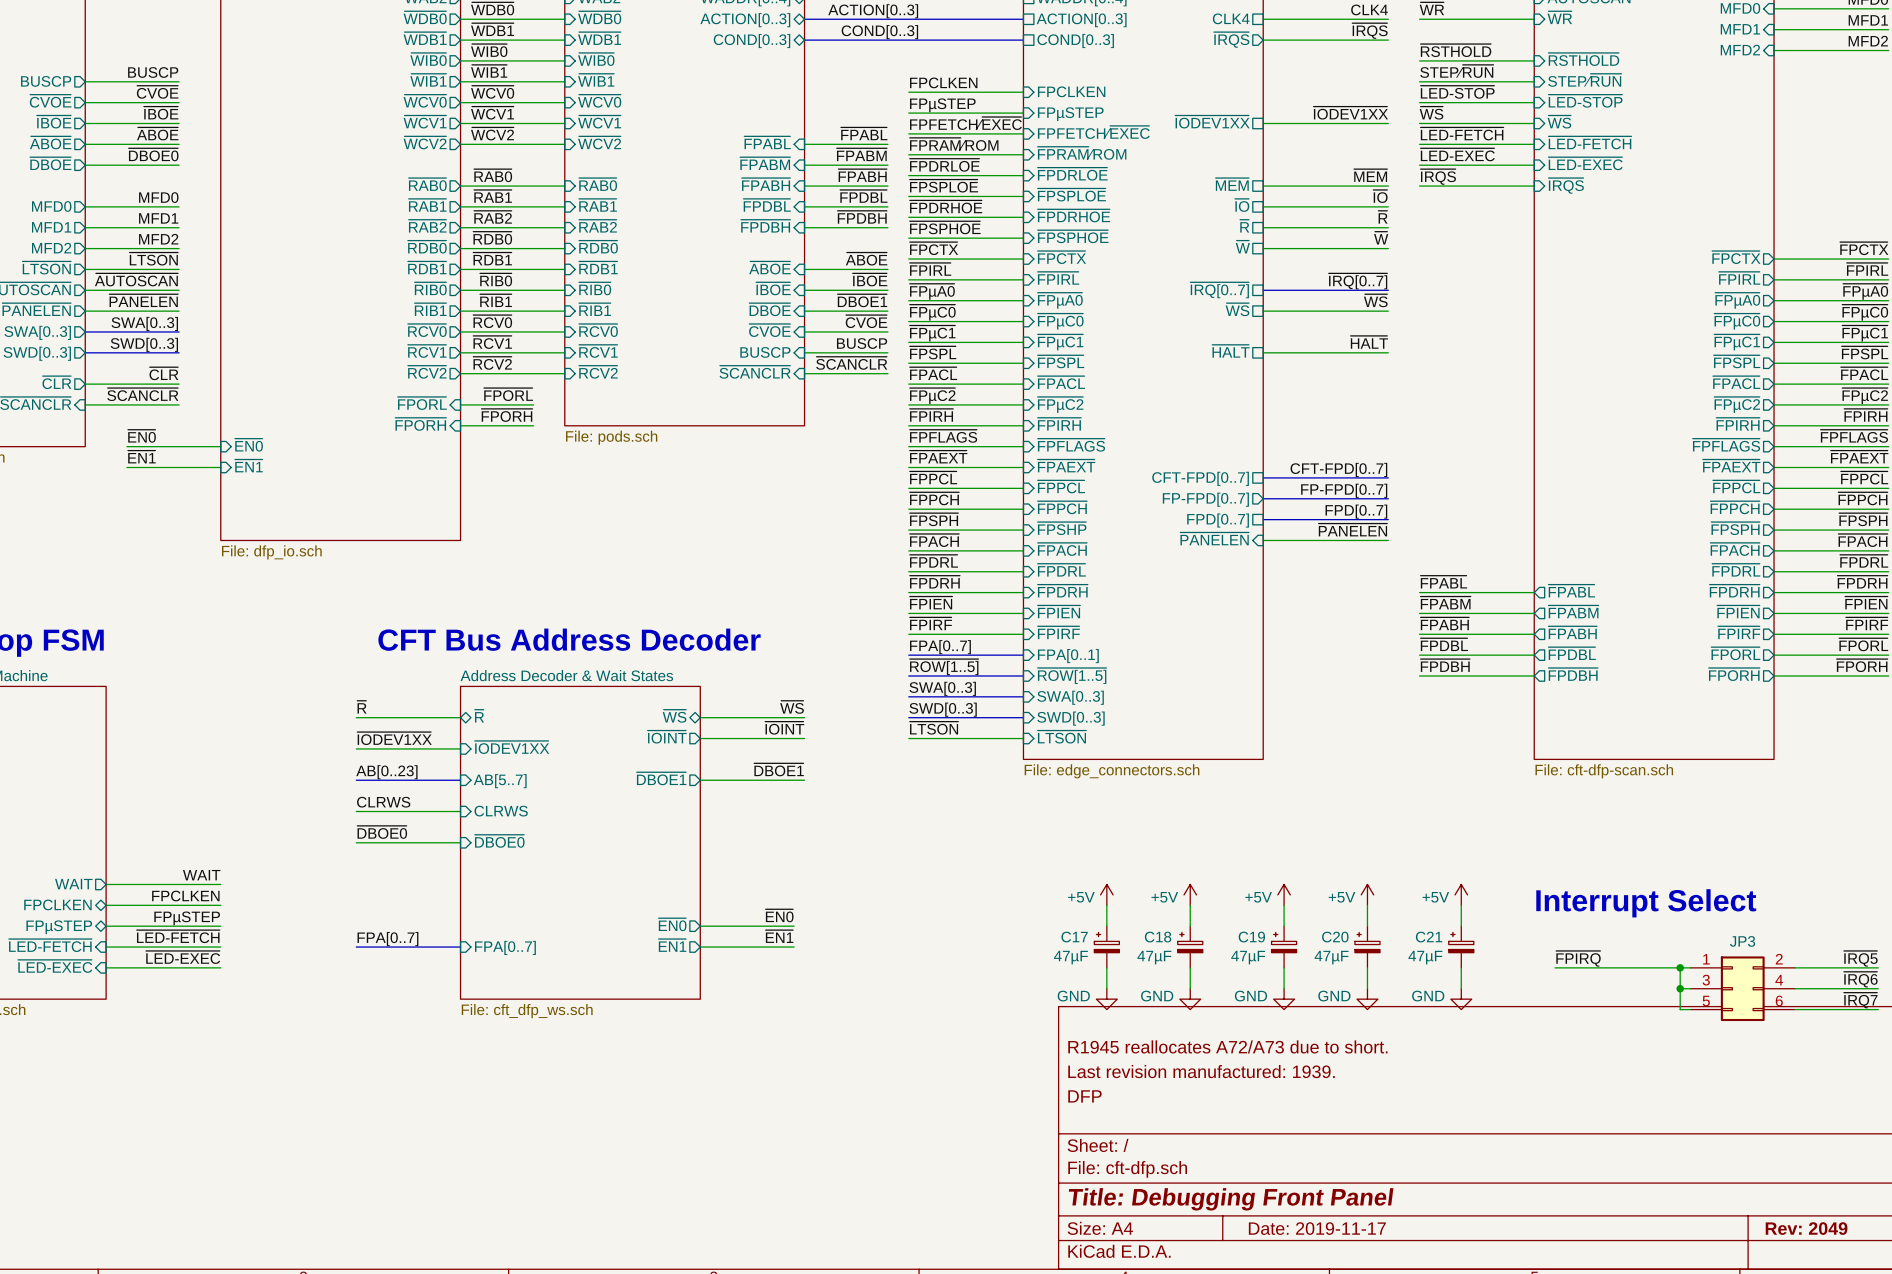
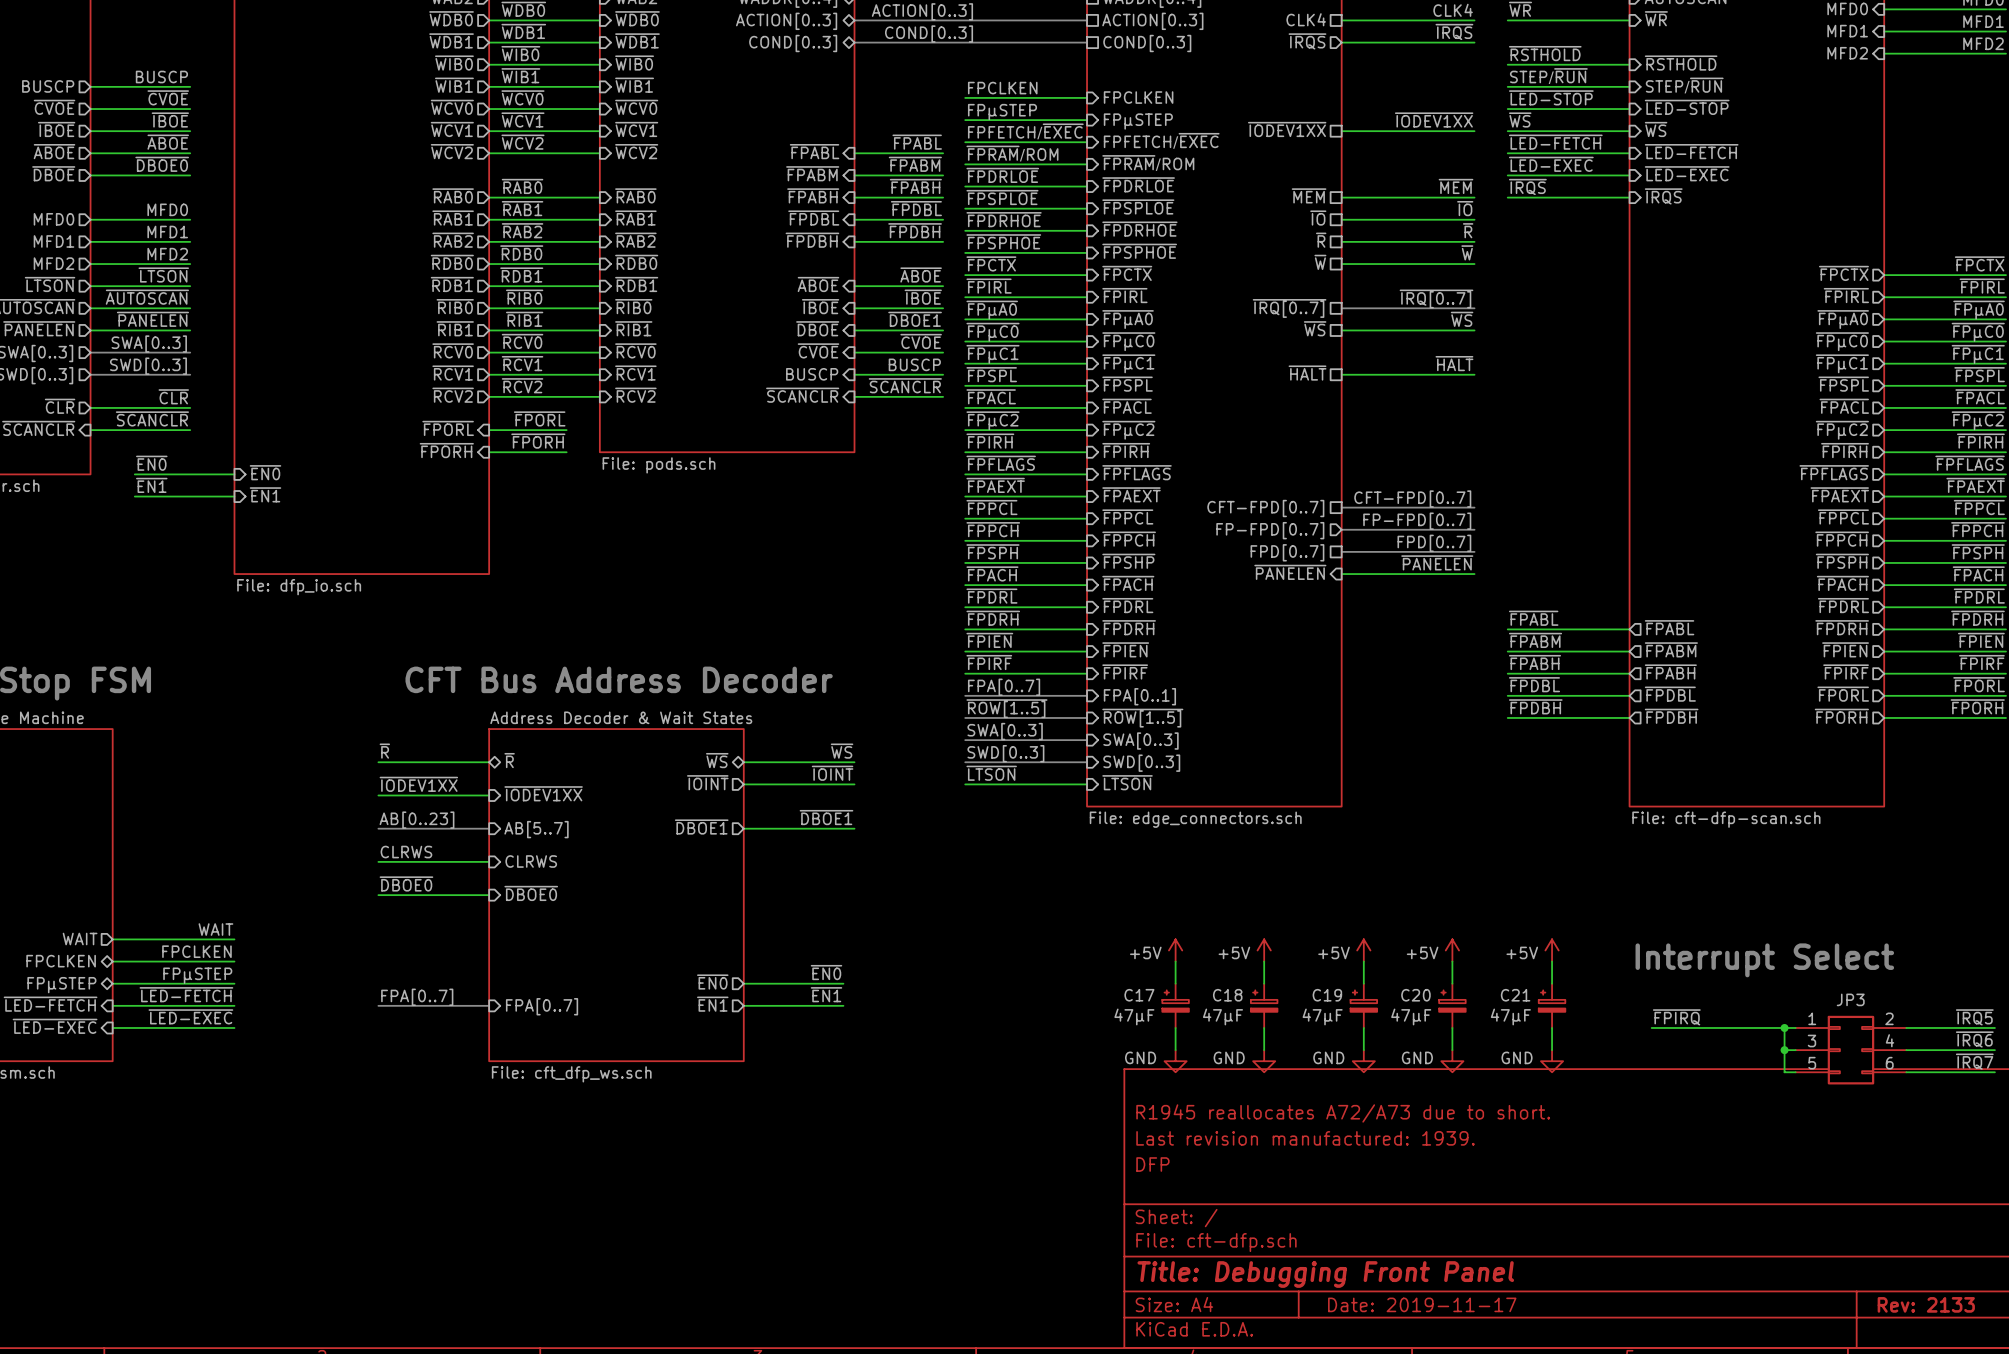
title block: Rev: 2049 (1806, 1228) -> Rev: 2133 (1926, 1304)

